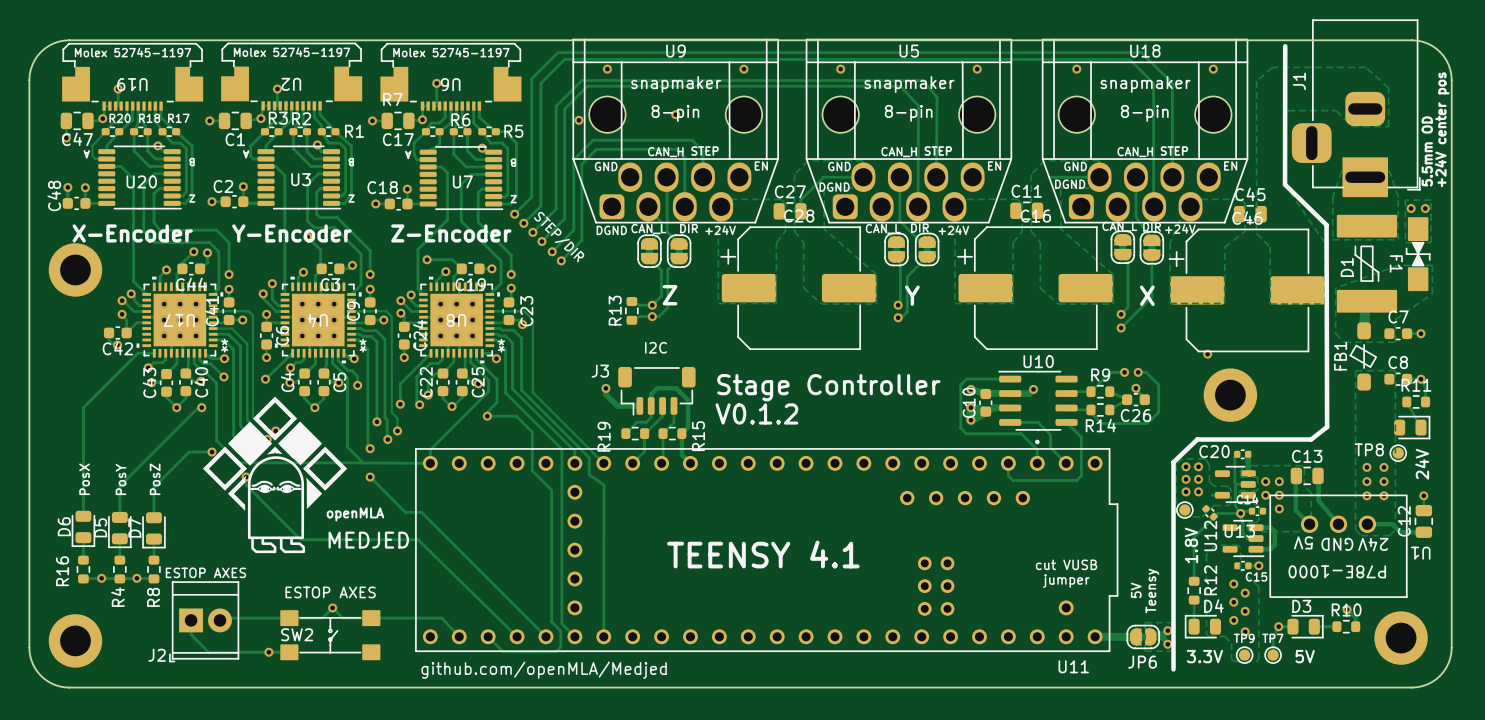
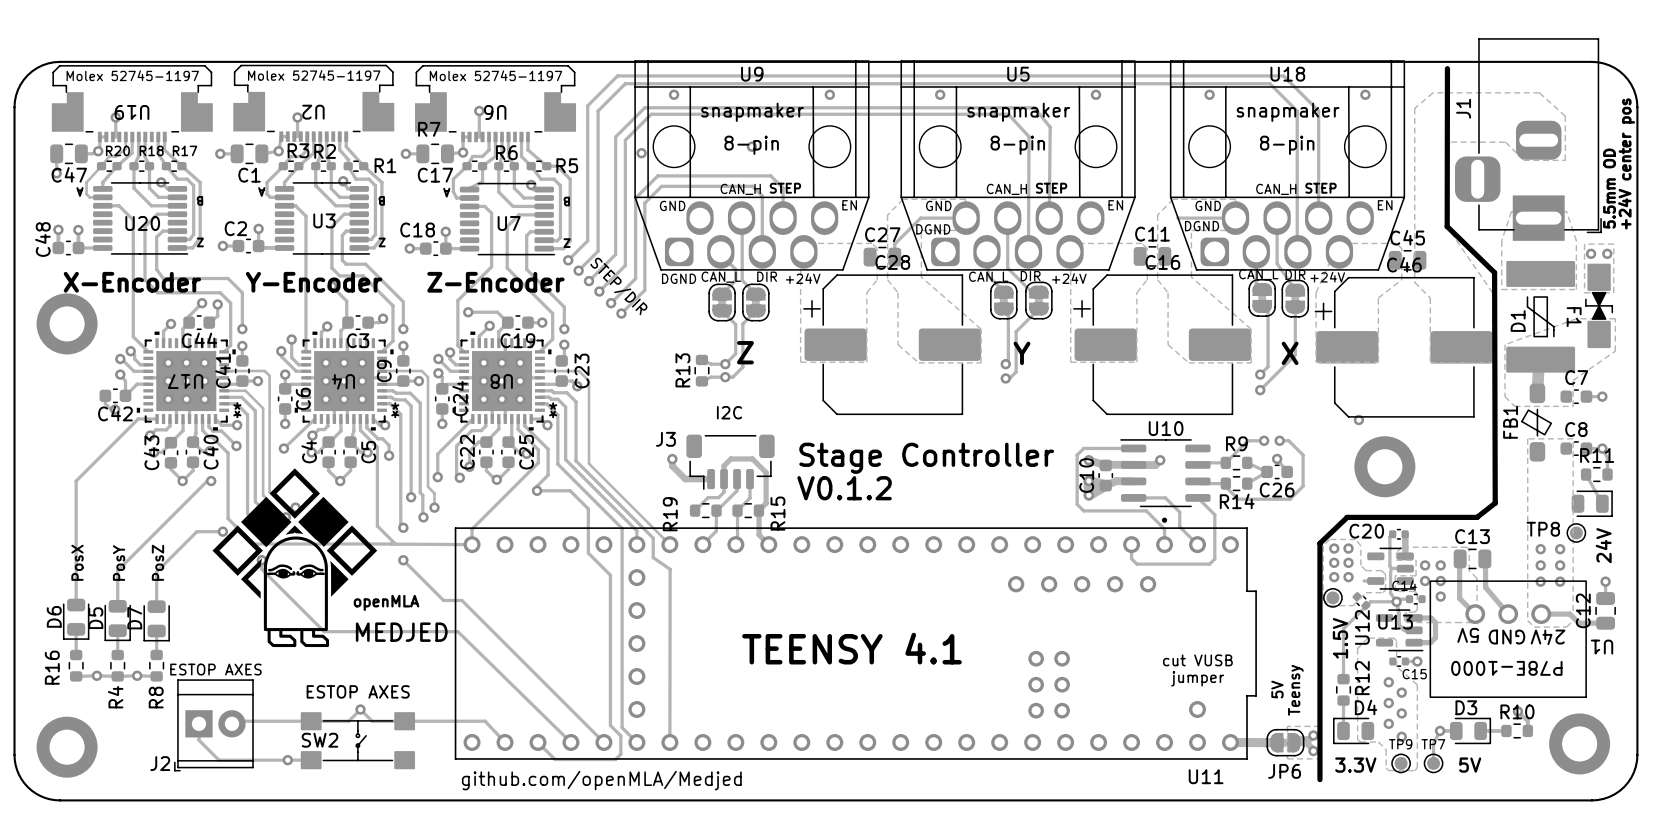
text: 1.8V (1191, 545) -> 1.5V (1340, 638)

